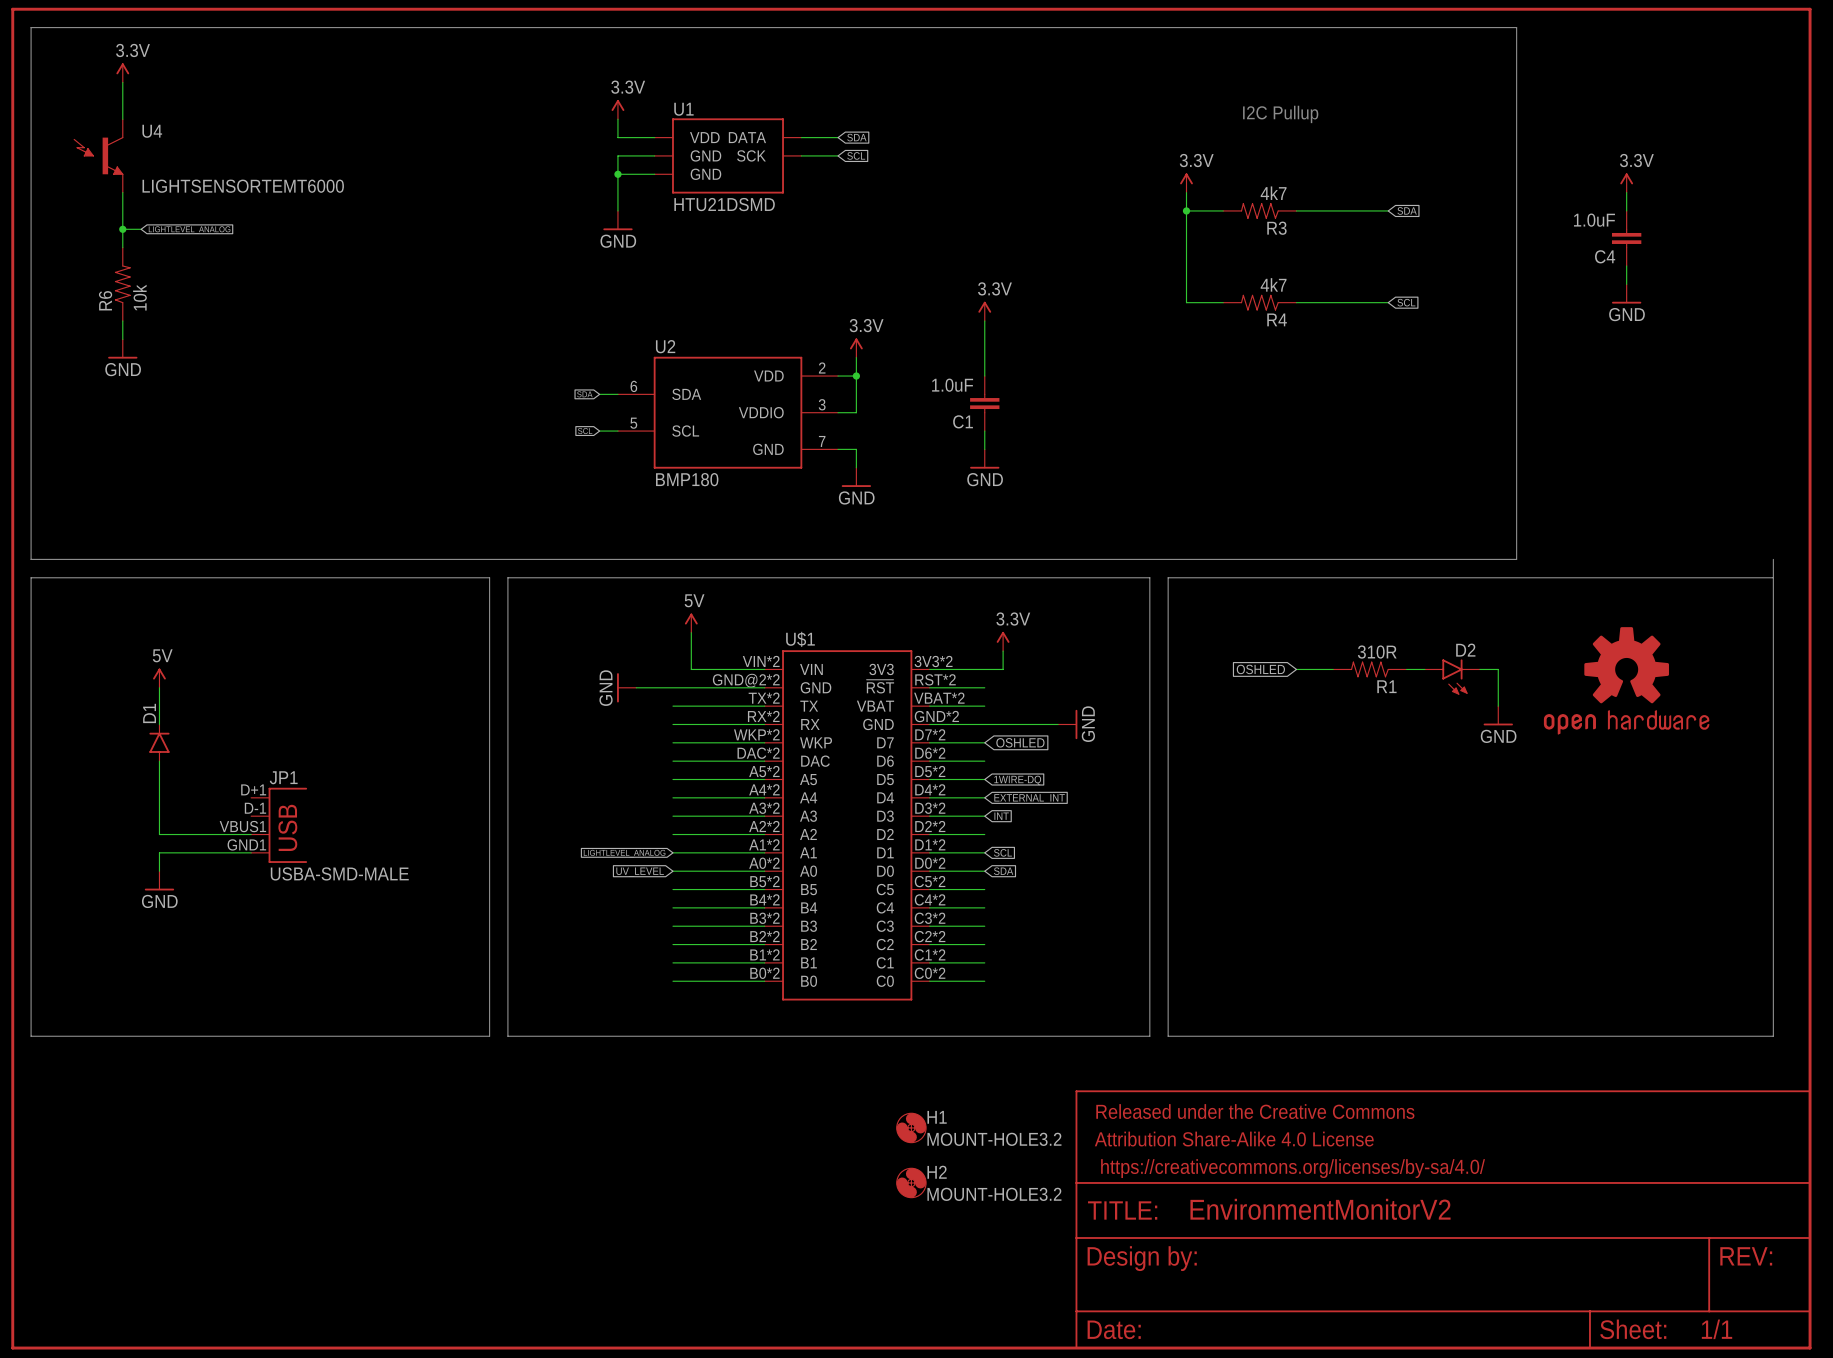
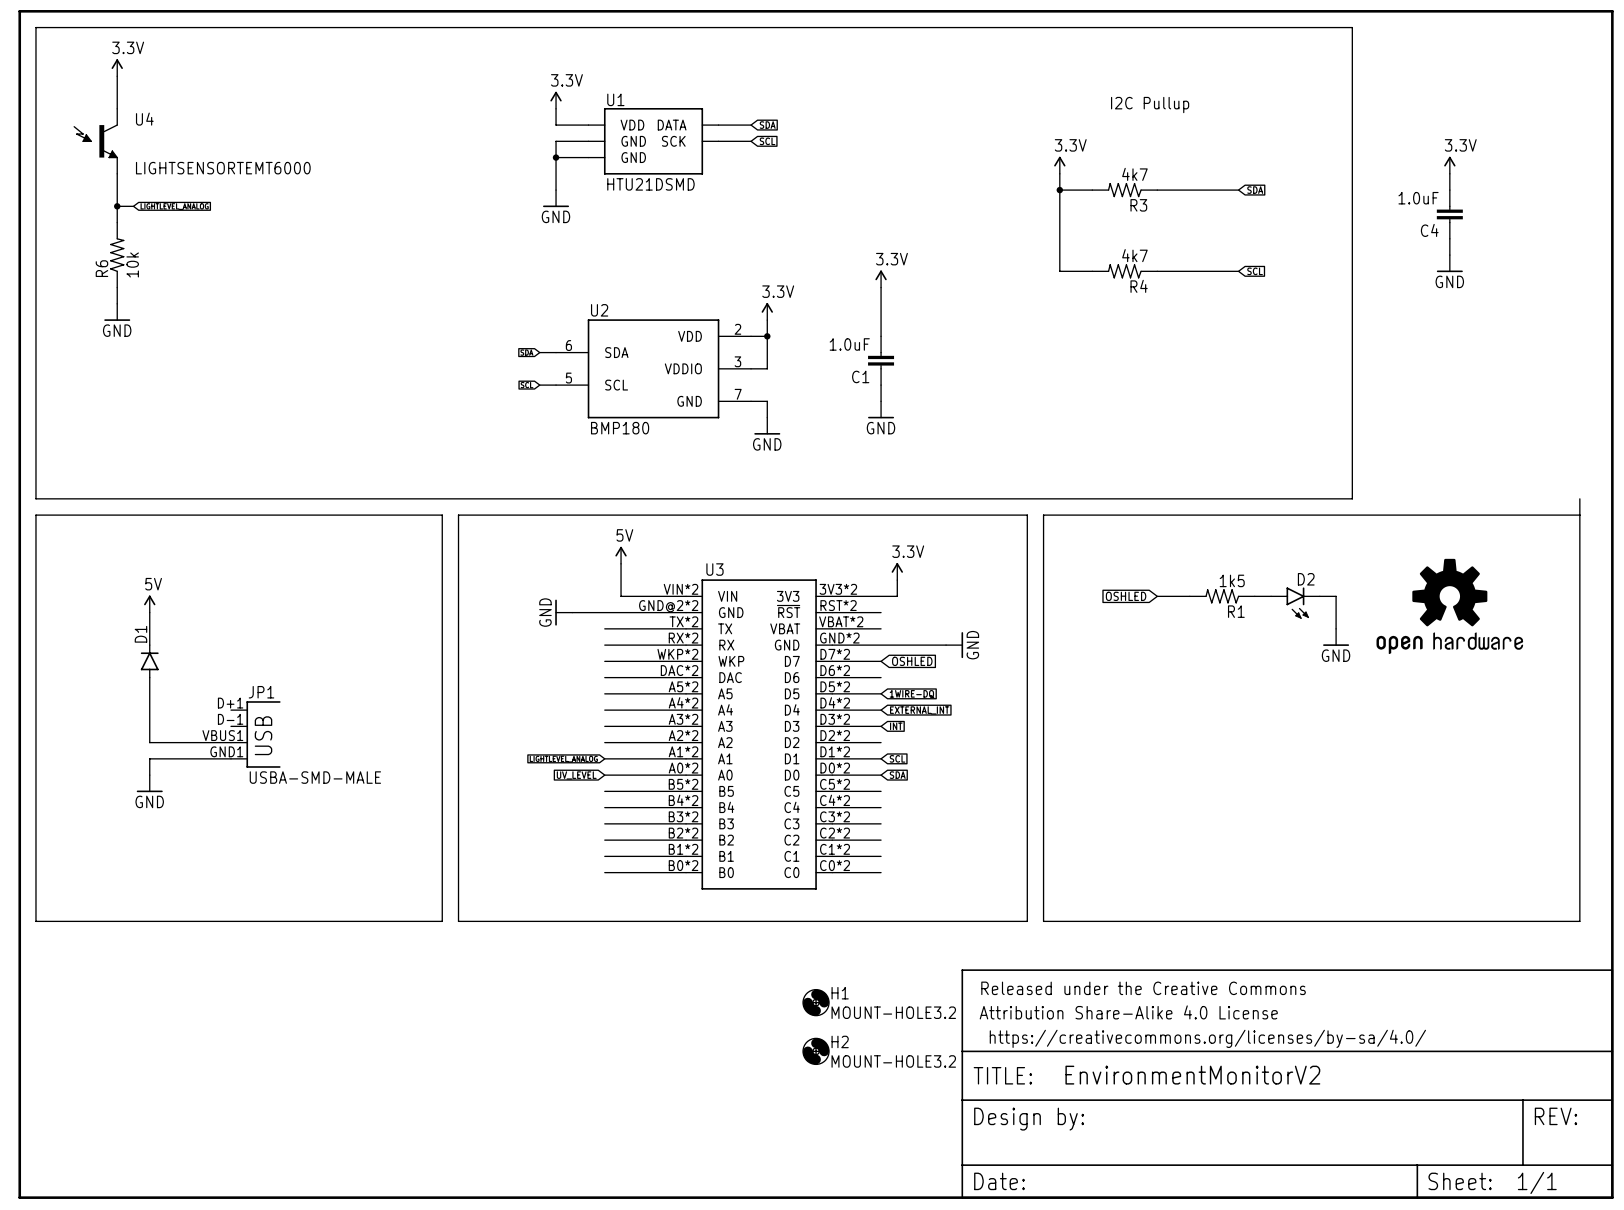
U$1 name: U$1 (800, 639) -> U3 (714, 569)
R1 value: 310R (1377, 652) -> 1k5 (1232, 580)

